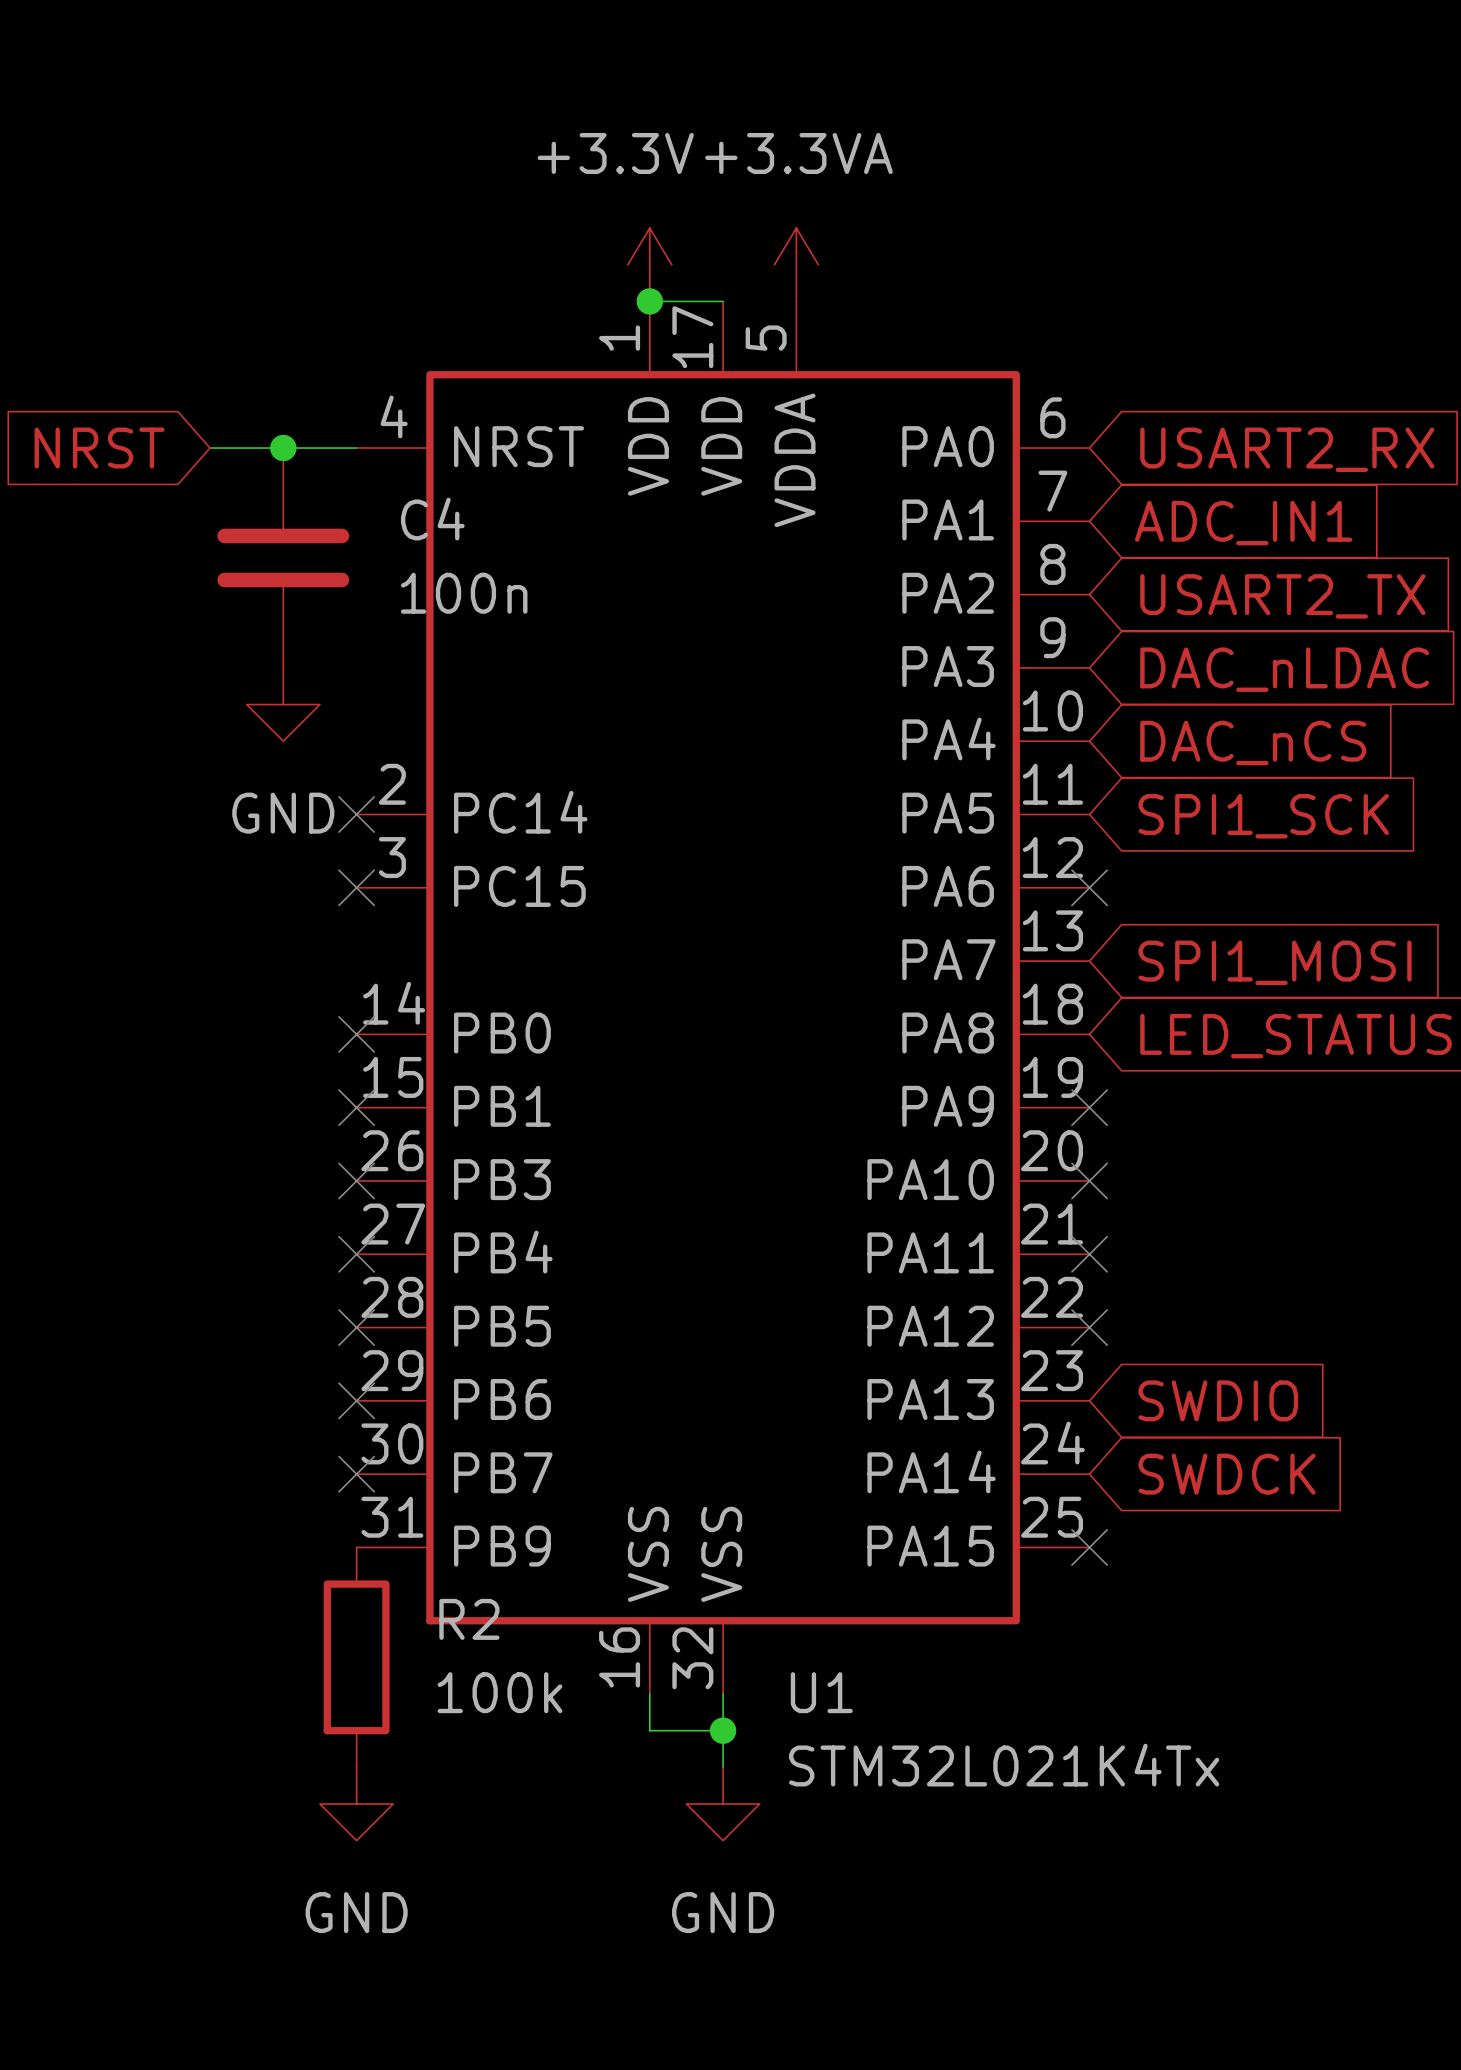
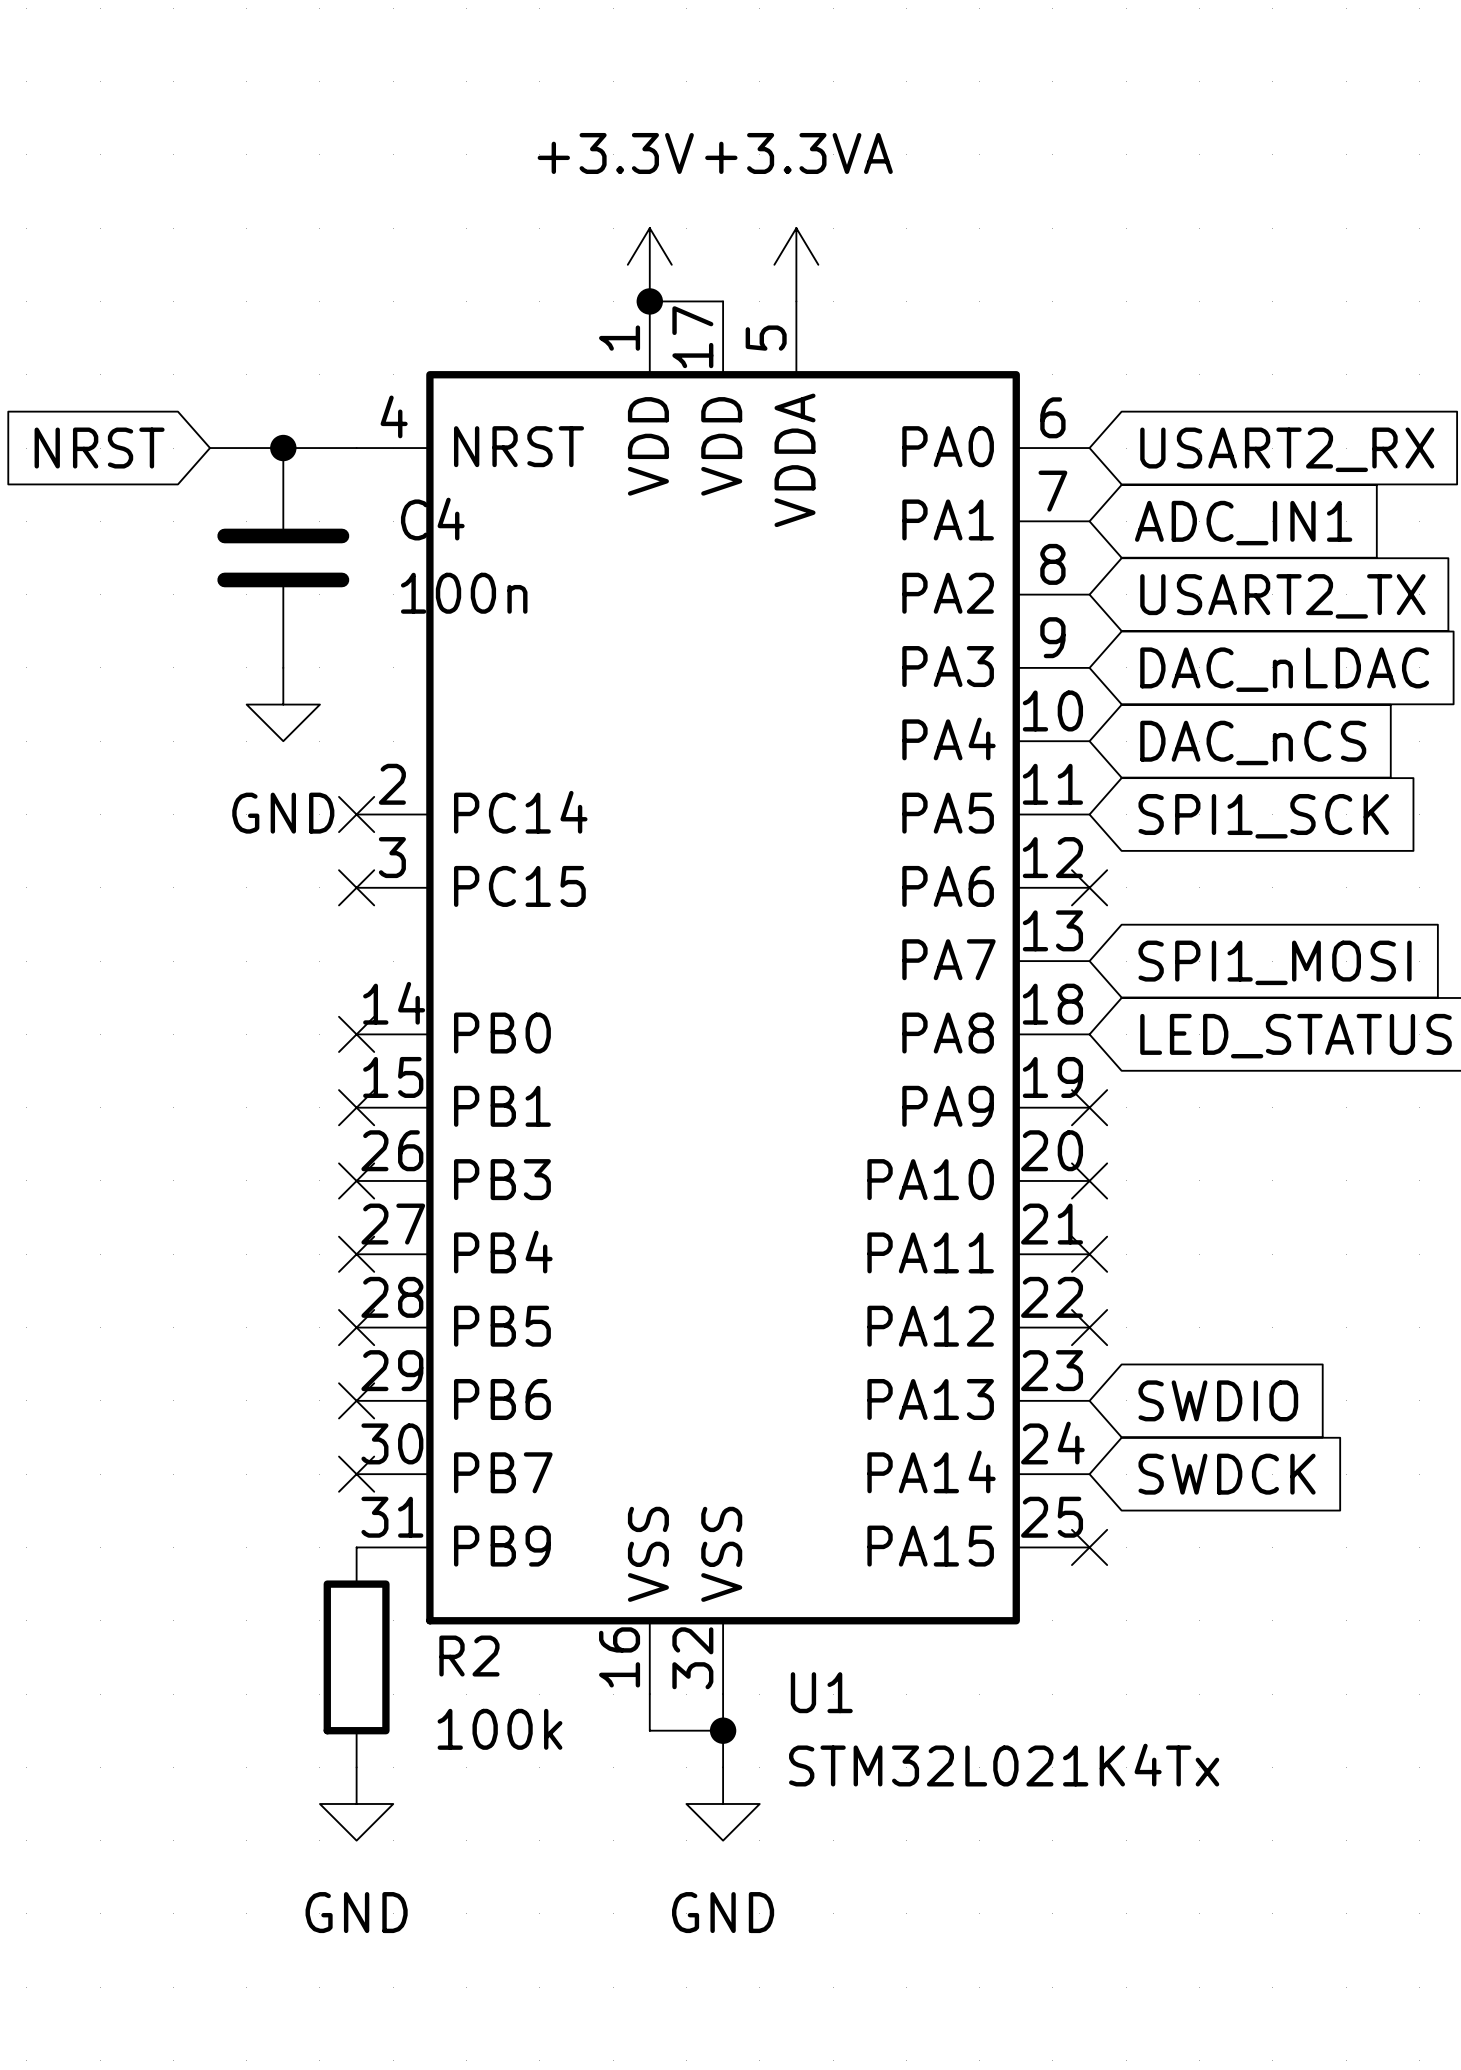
R2 name position: R2 (469, 1619) -> R2 (469, 1656)
R2 value position: 100k (499, 1692) -> 100k (499, 1729)

